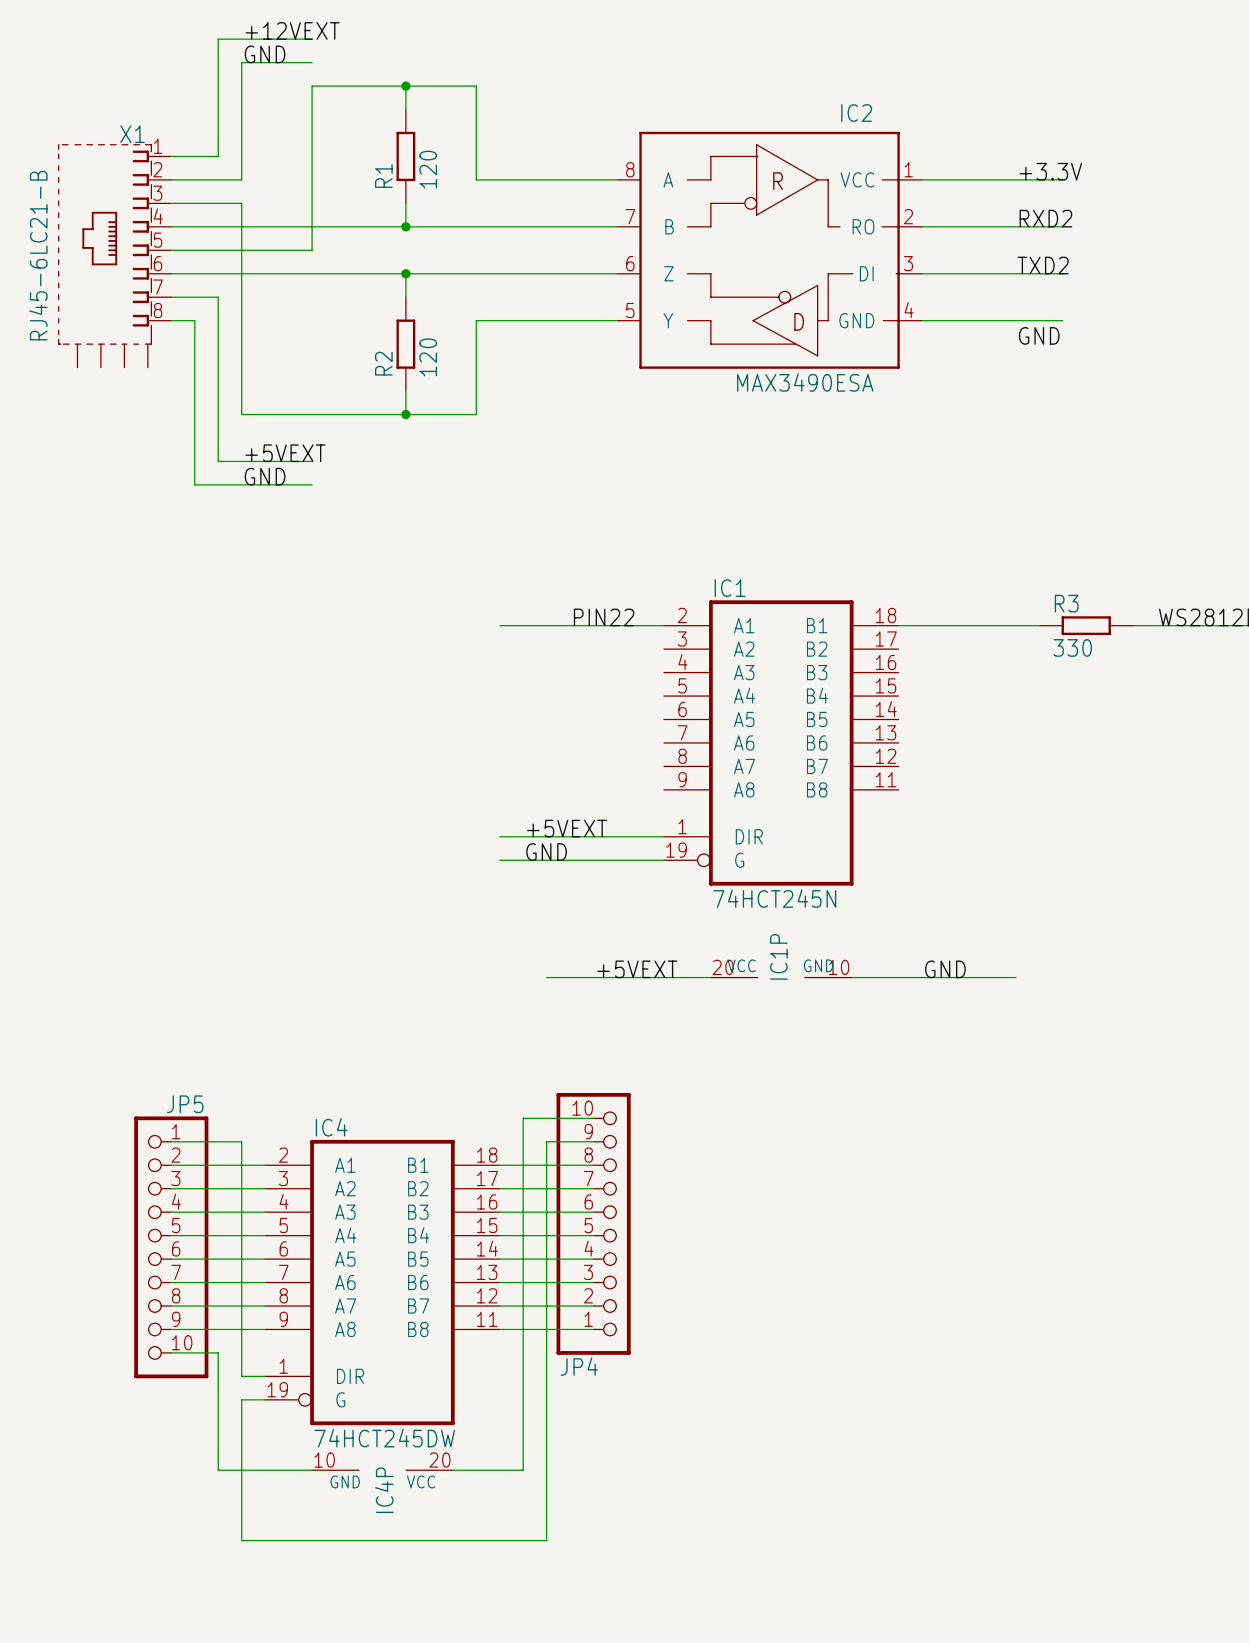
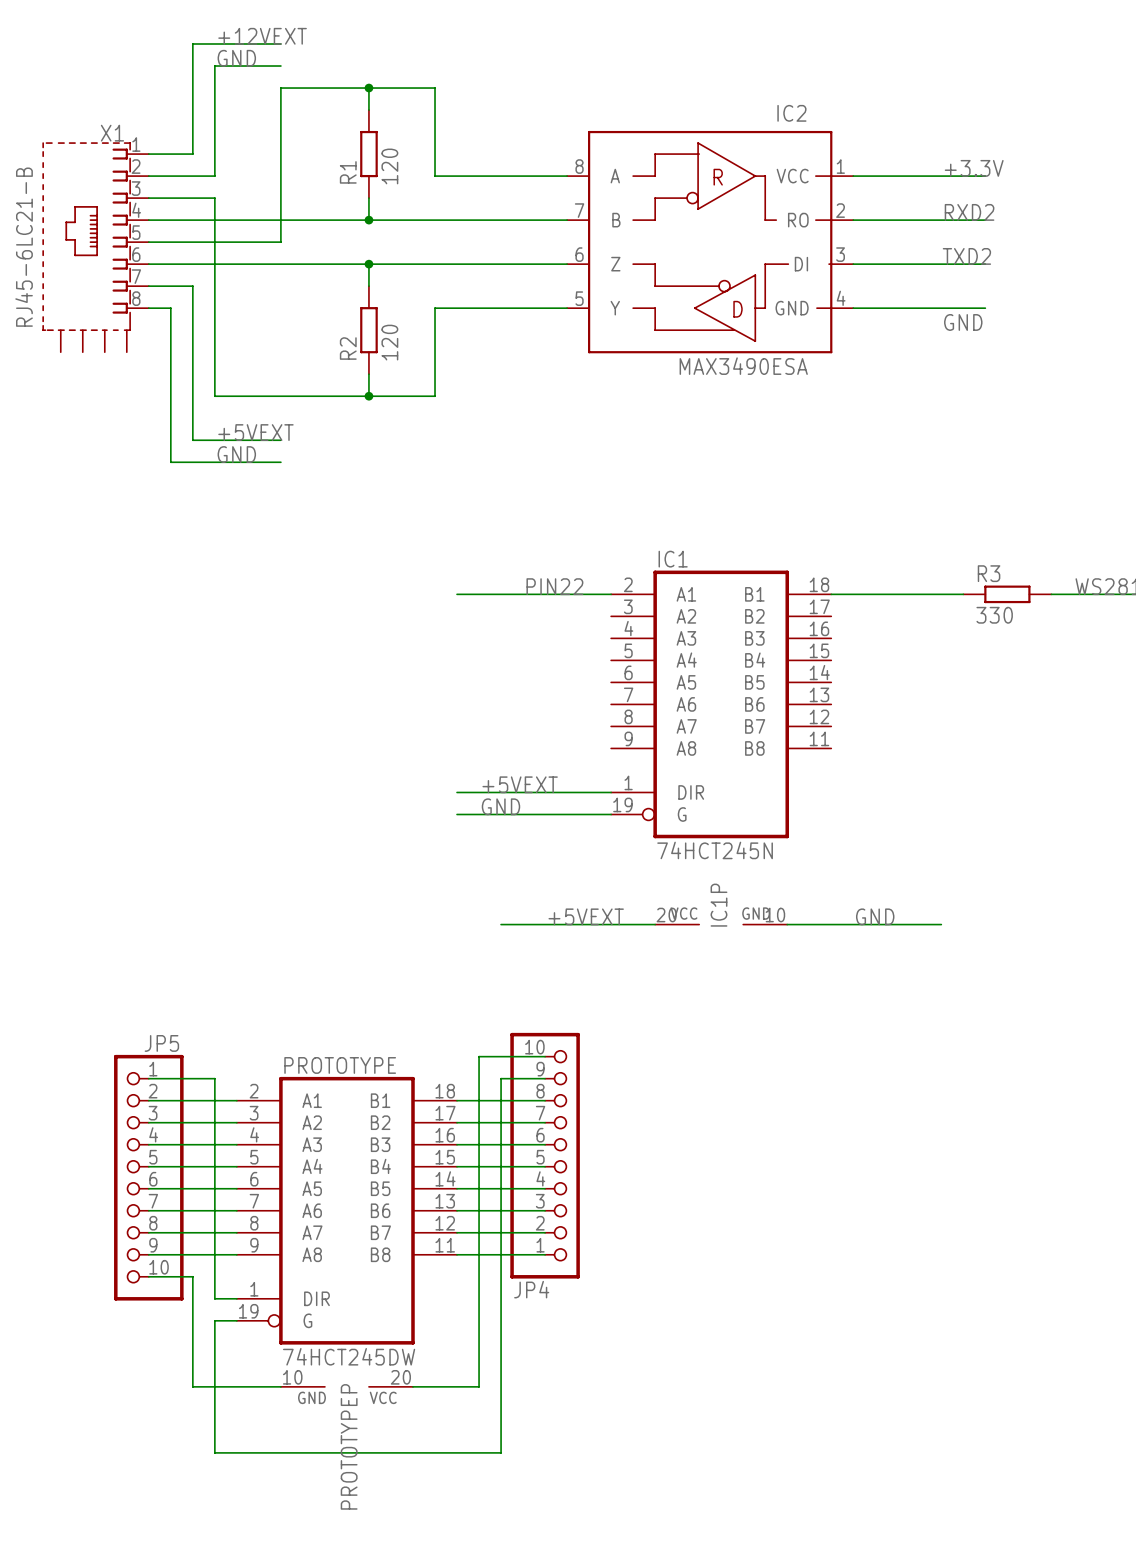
IC4 name: IC4 (331, 1127) -> PROTOTYPE (340, 1065)
IC4P name: IC4P (384, 1490) -> PROTOTYPEP (349, 1446)

